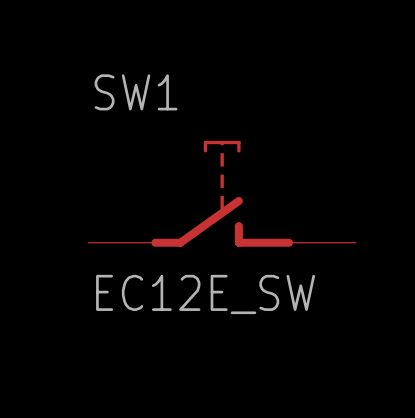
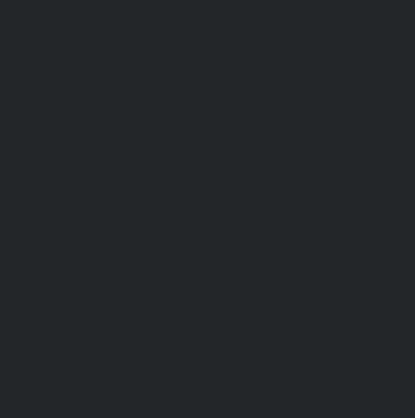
SW1: EC12E_SW (222, 193) -> none

